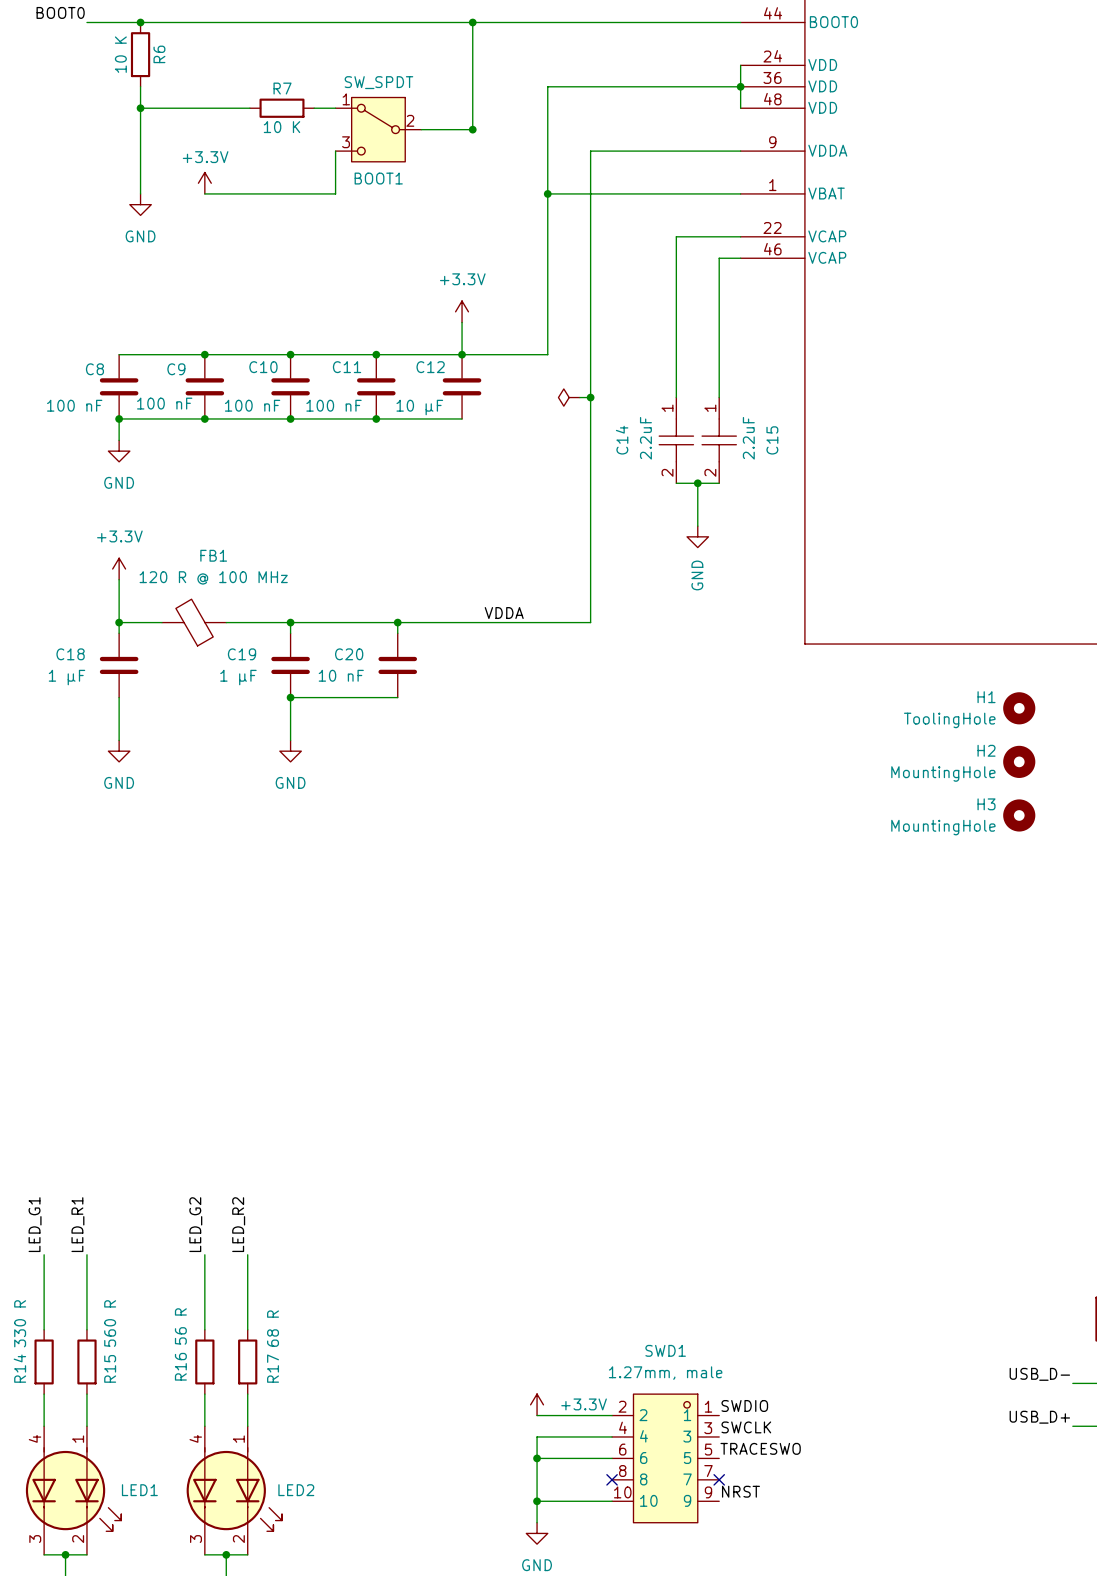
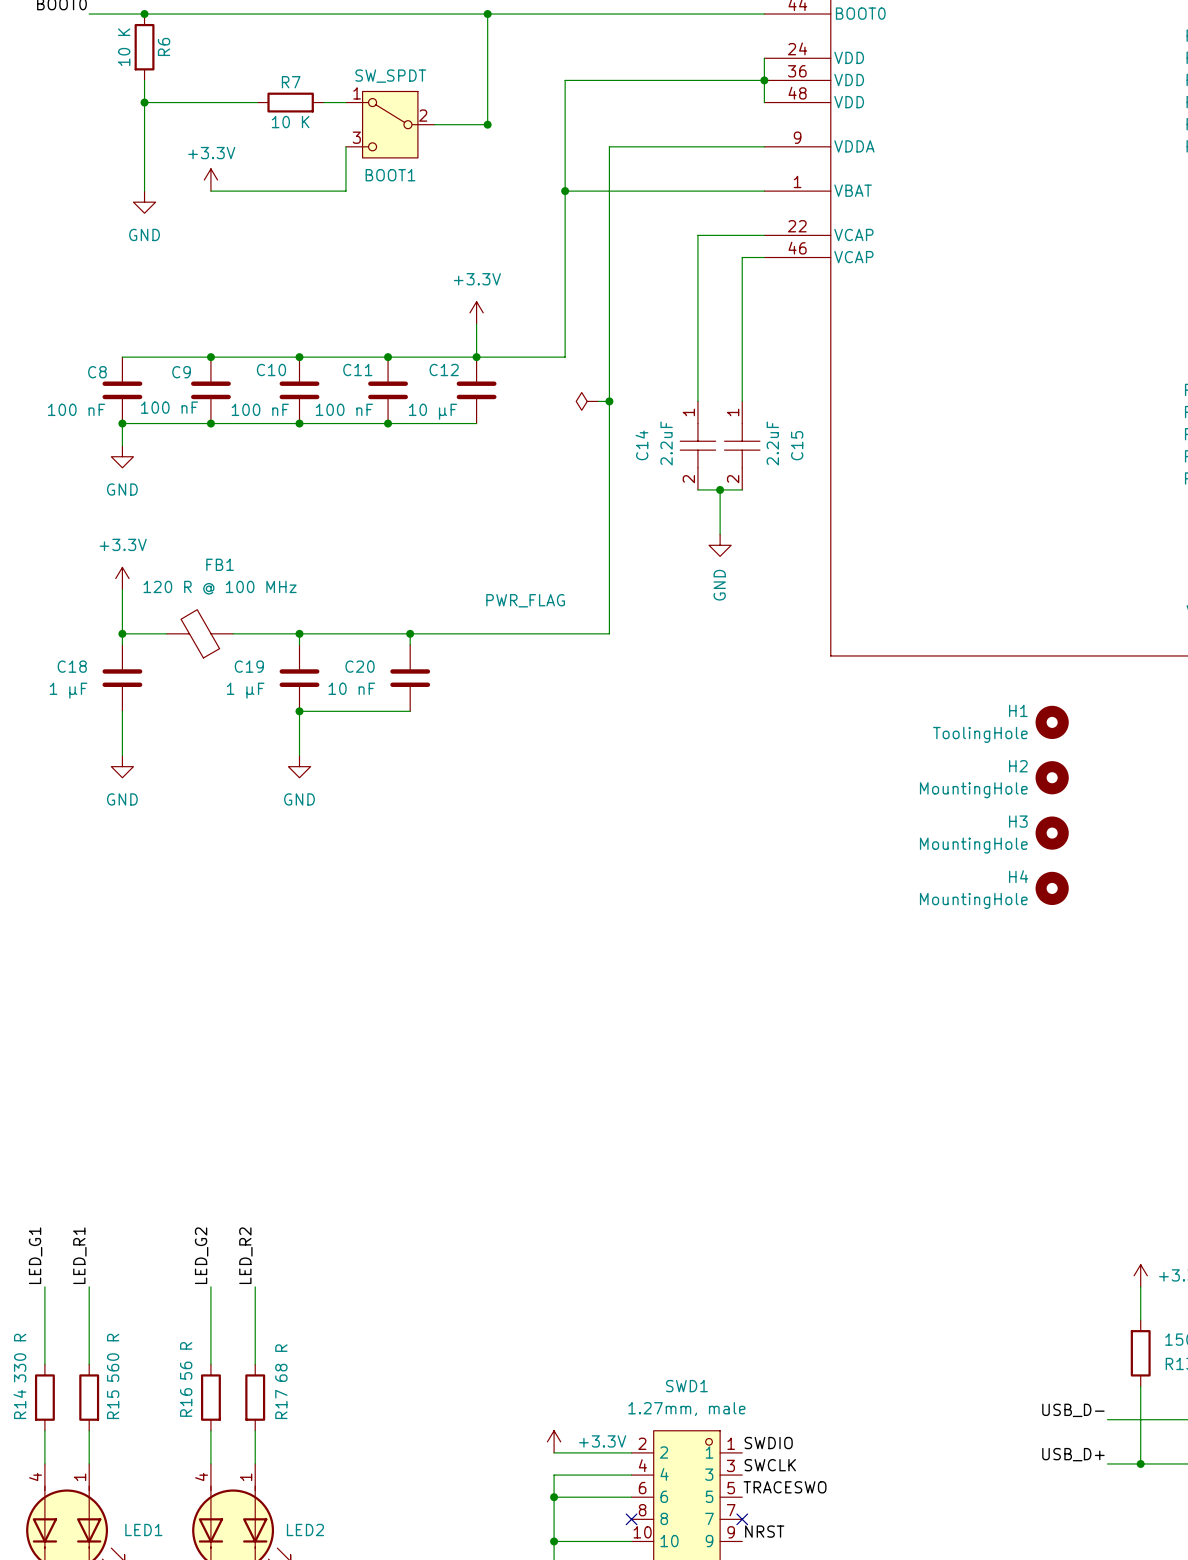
power symbol text: none -> PWR_FLAG (525, 600)
label: VDDA (504, 613) -> none
H4: none -> MountingHole (1052, 888)

